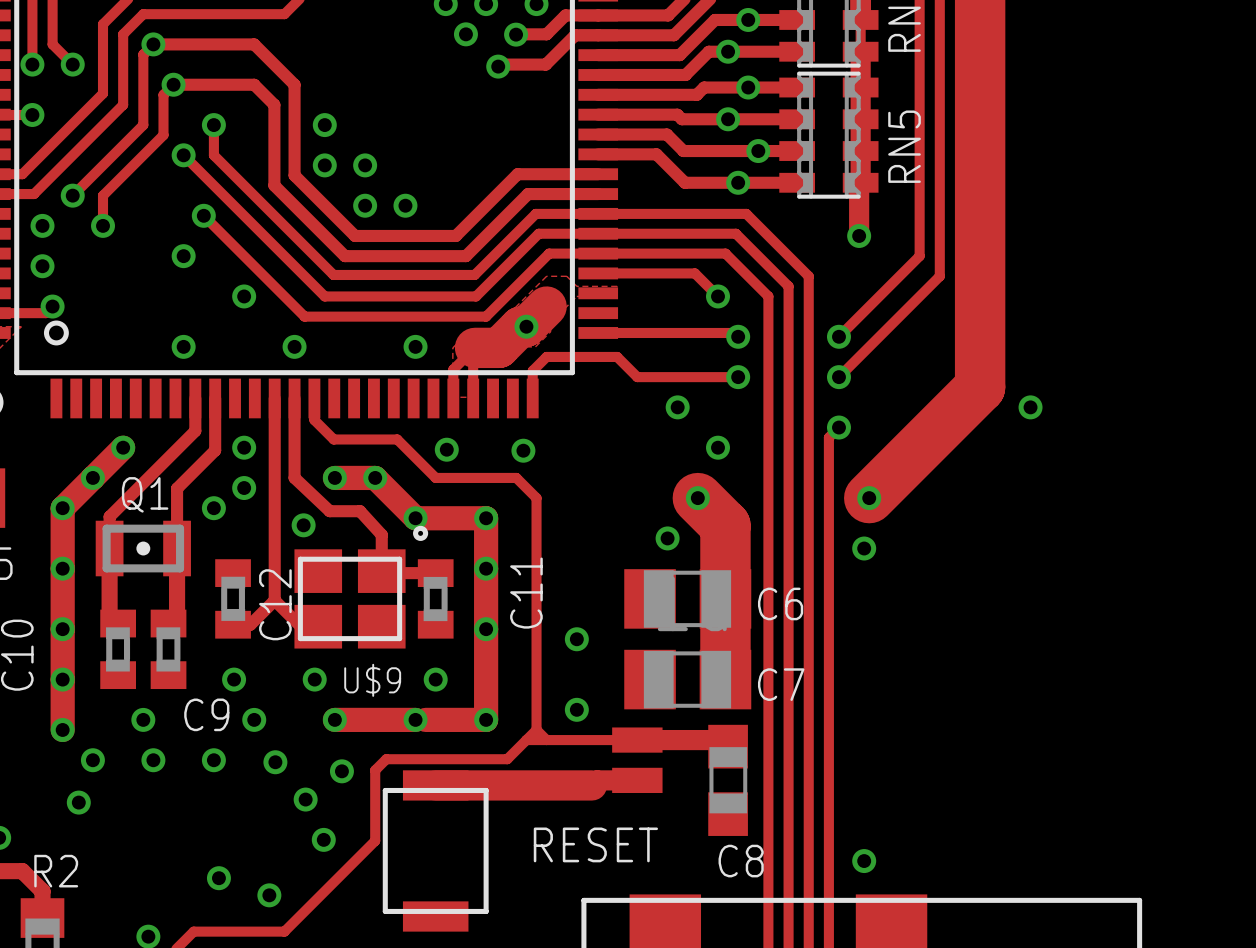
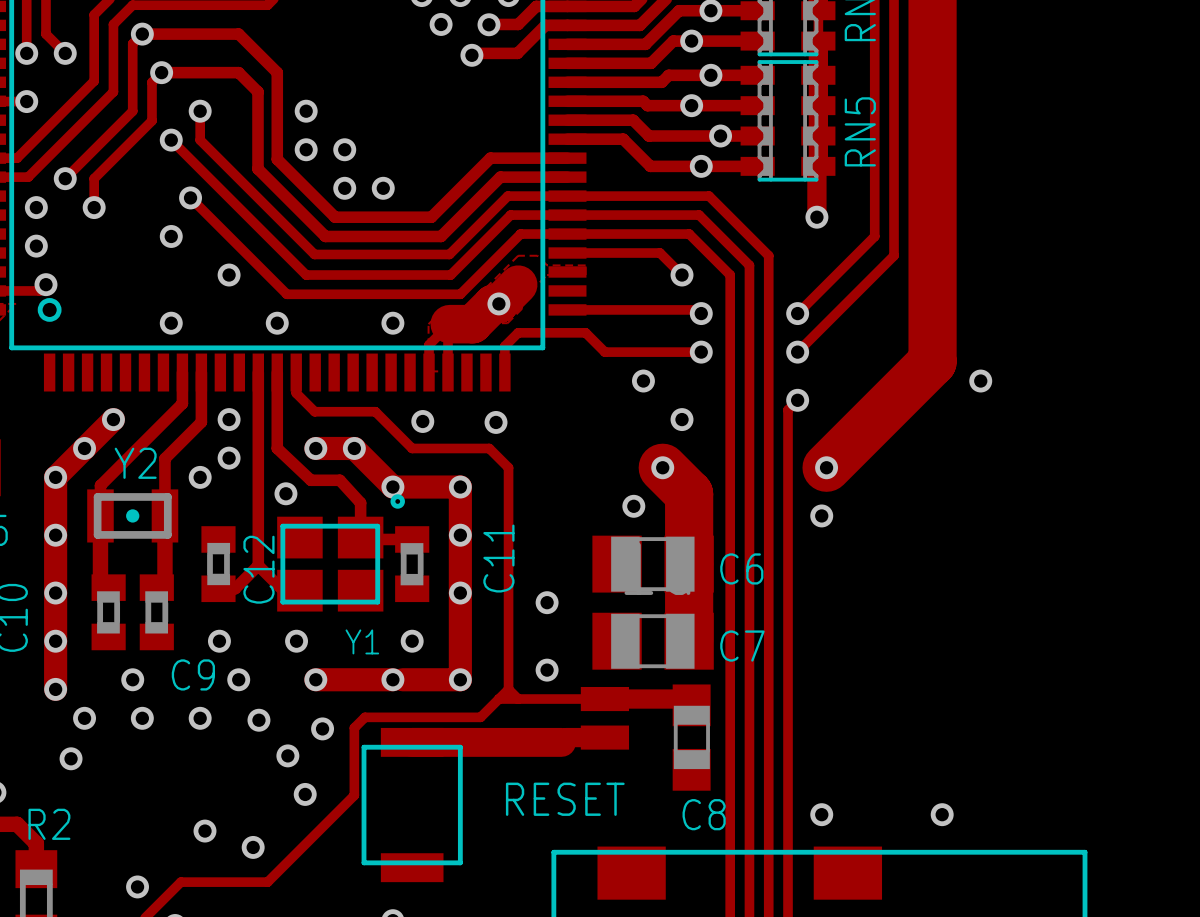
Q1 name: Q1 (145, 494) -> Y2 (135, 463)
U$9 name: U$9 (372, 680) -> Y1 (362, 641)
via: none -> (942, 814)

